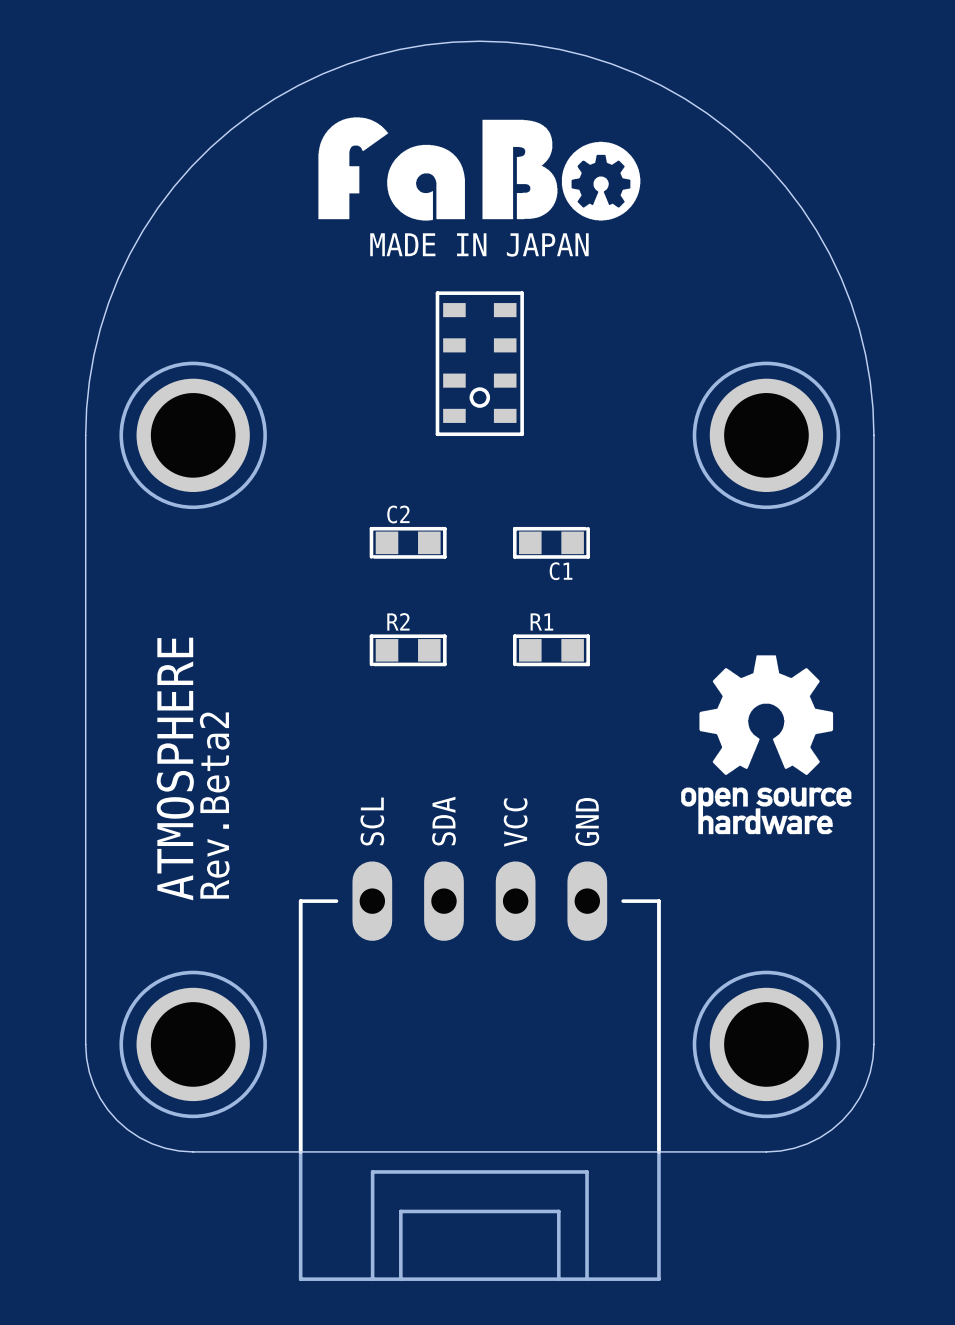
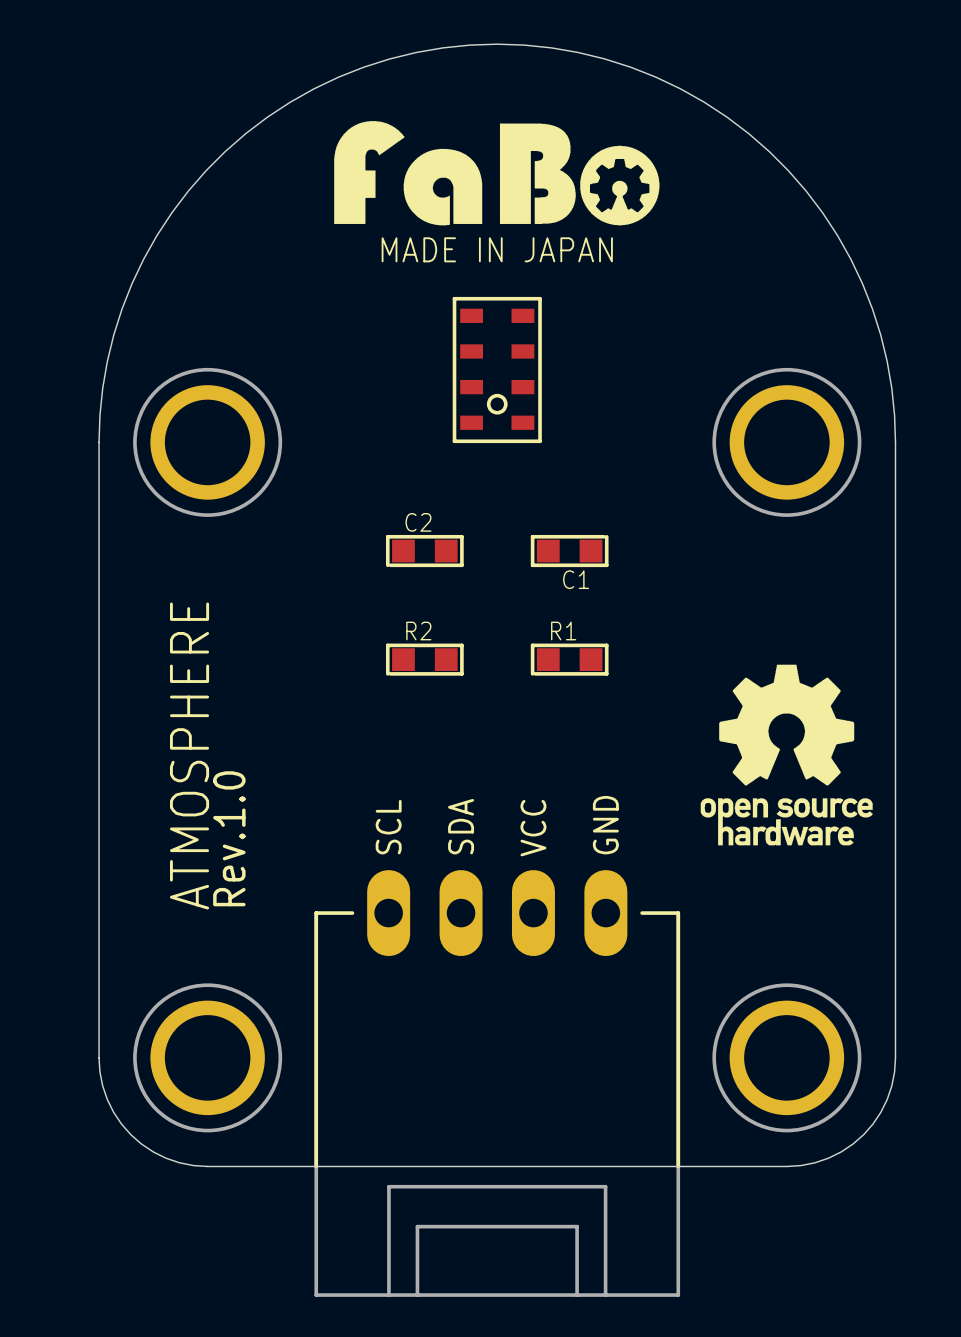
part footprint: [85, 41, 874, 1281] -> [99, 44, 896, 1297]
text: Rev.Beta2 (214, 805) -> Rev.1.0 (229, 838)

